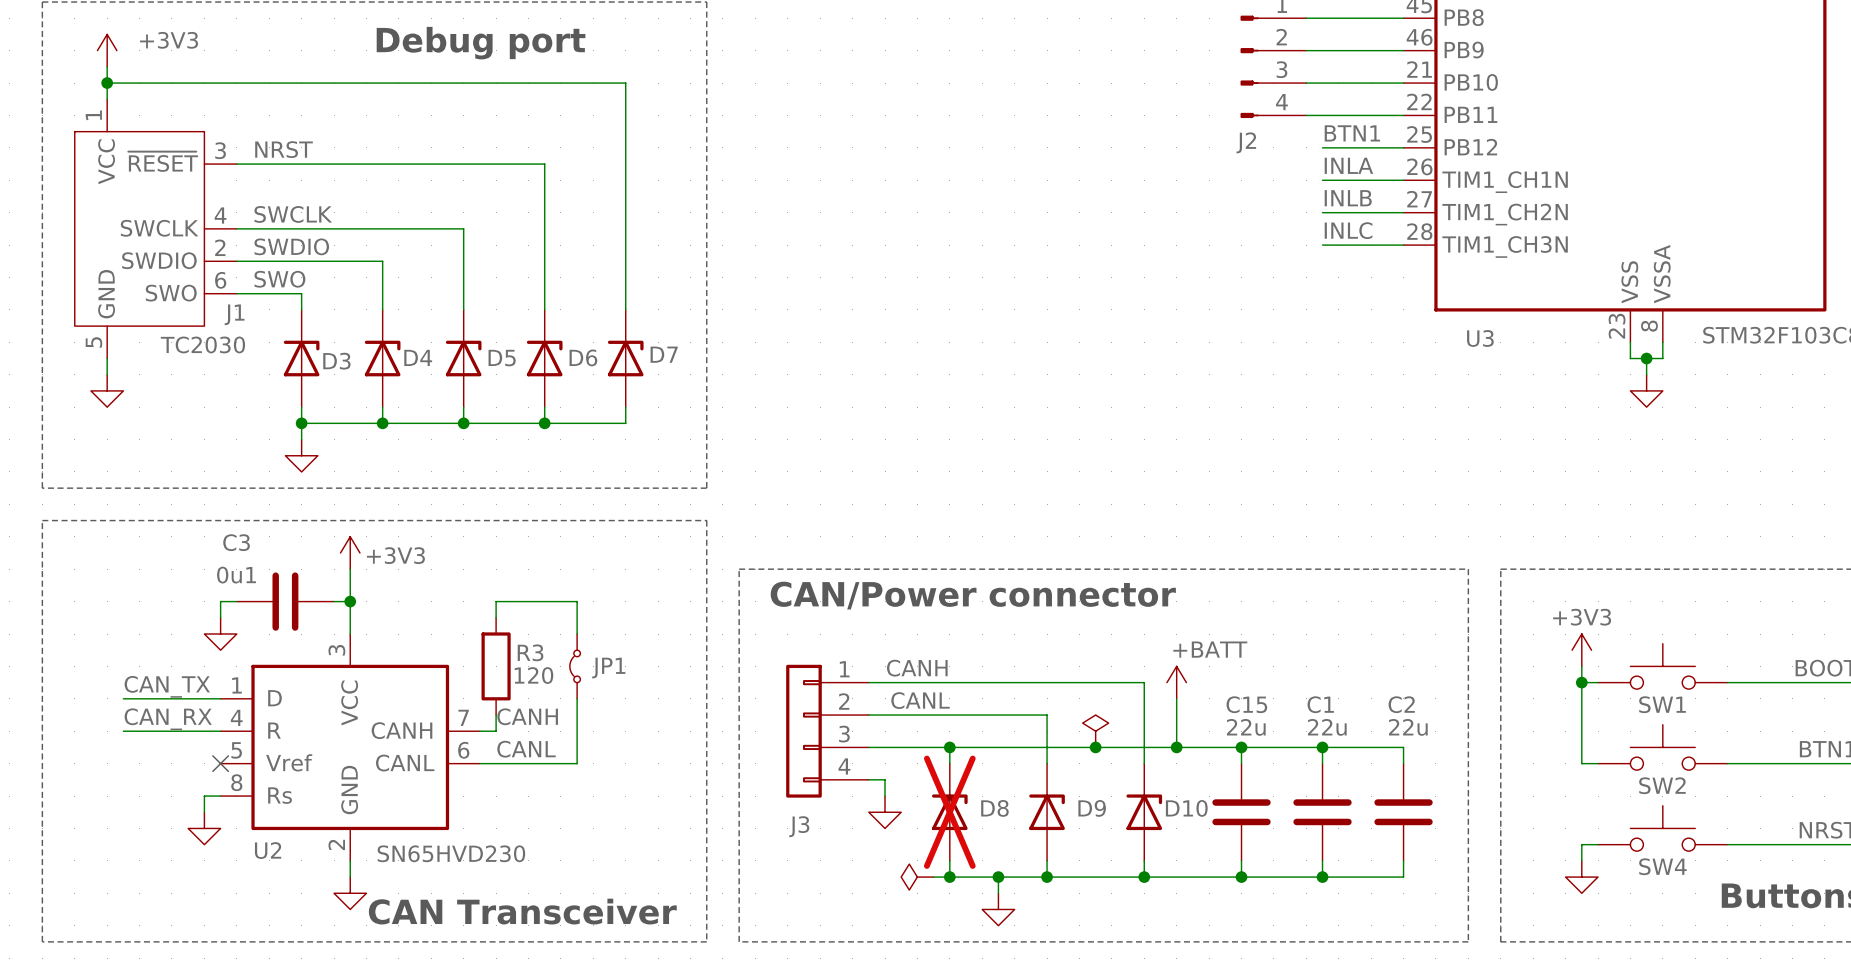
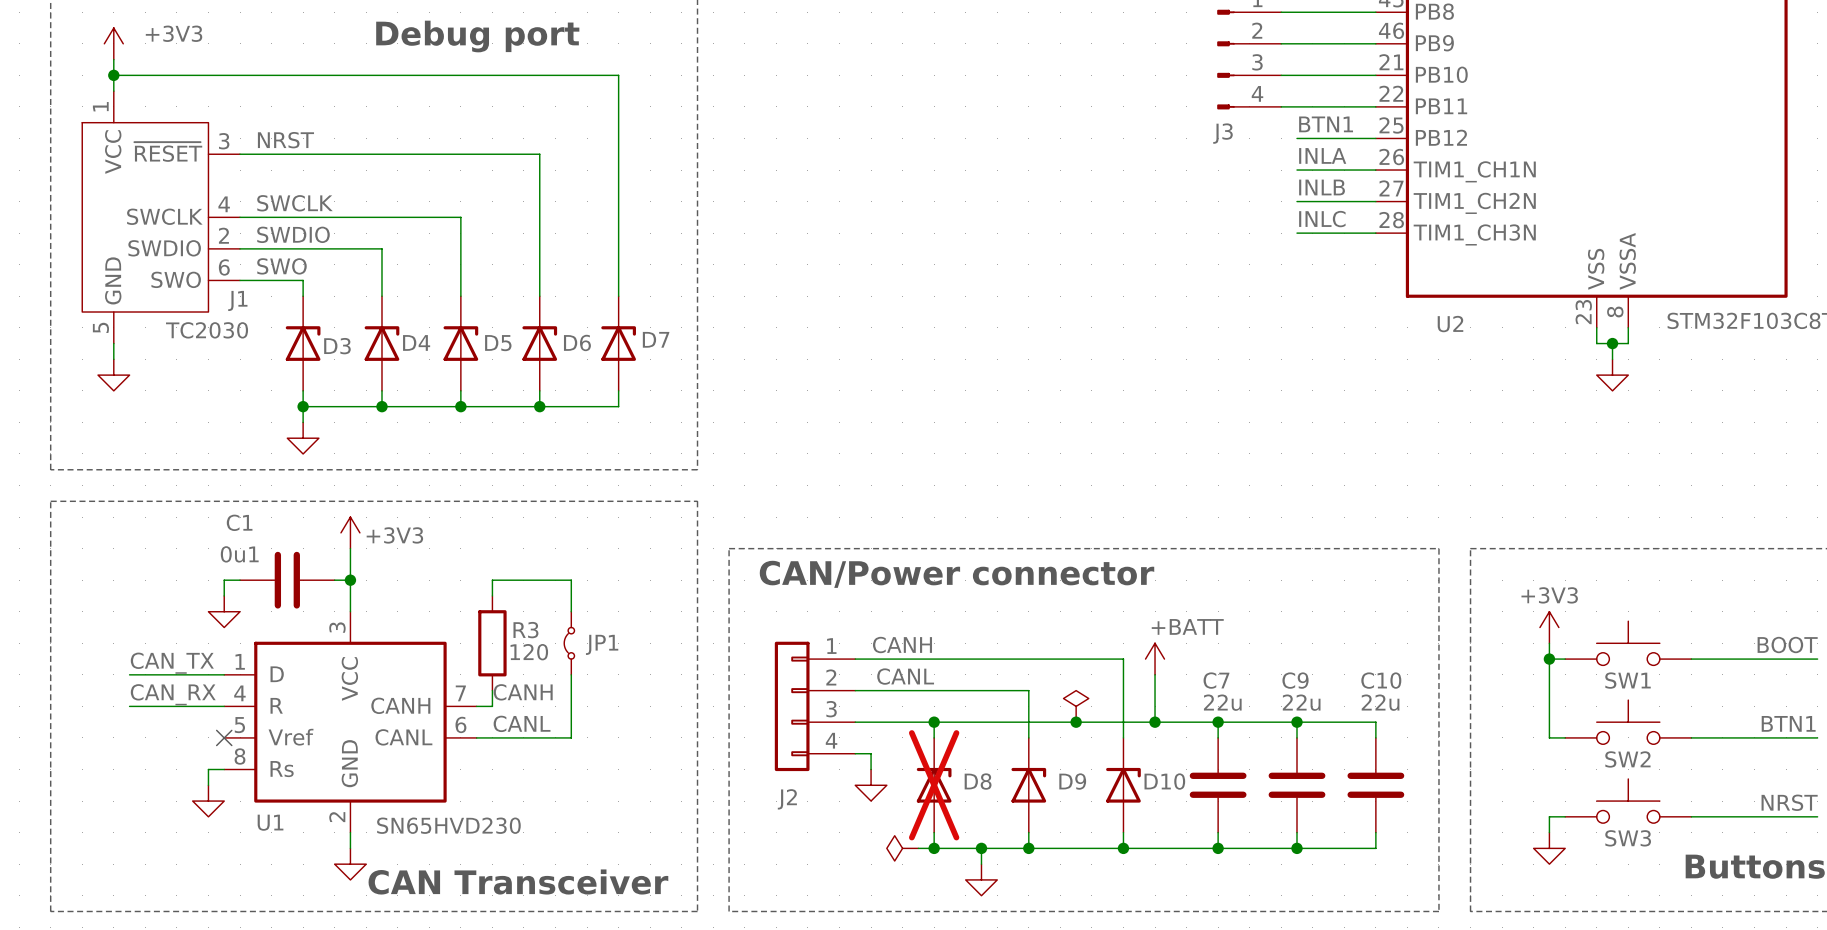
J2 name: J2 (1246, 142) -> J3 (1223, 133)
U3 name: U3 (1480, 338) -> U2 (1450, 324)
C3 name: C3 (236, 542) -> C1 (239, 522)
C15 name: C15 (1246, 704) -> C7 (1216, 680)
C1 name: C1 (1320, 704) -> C9 (1295, 680)
C2 name: C2 (1401, 704) -> C10 (1381, 680)
J3 name: J3 (799, 826) -> J2 (787, 799)
U2 name: U2 (268, 850) -> U1 (270, 822)
SW4 name: SW4 (1662, 866) -> SW3 (1628, 838)

